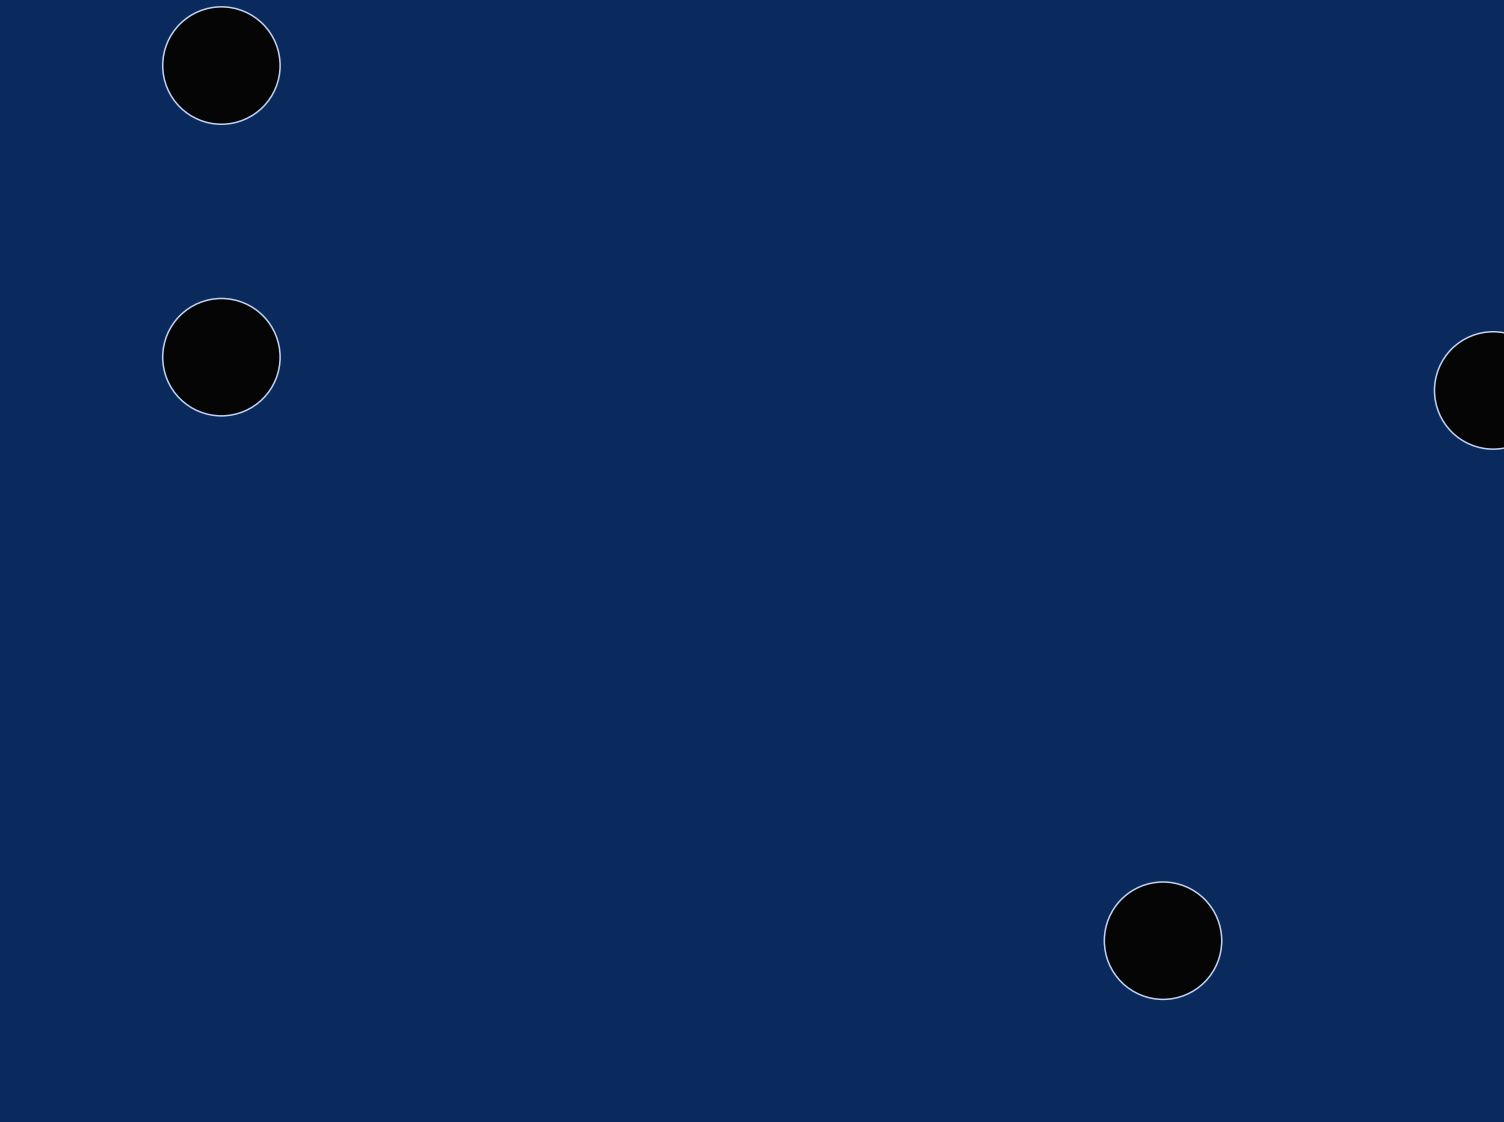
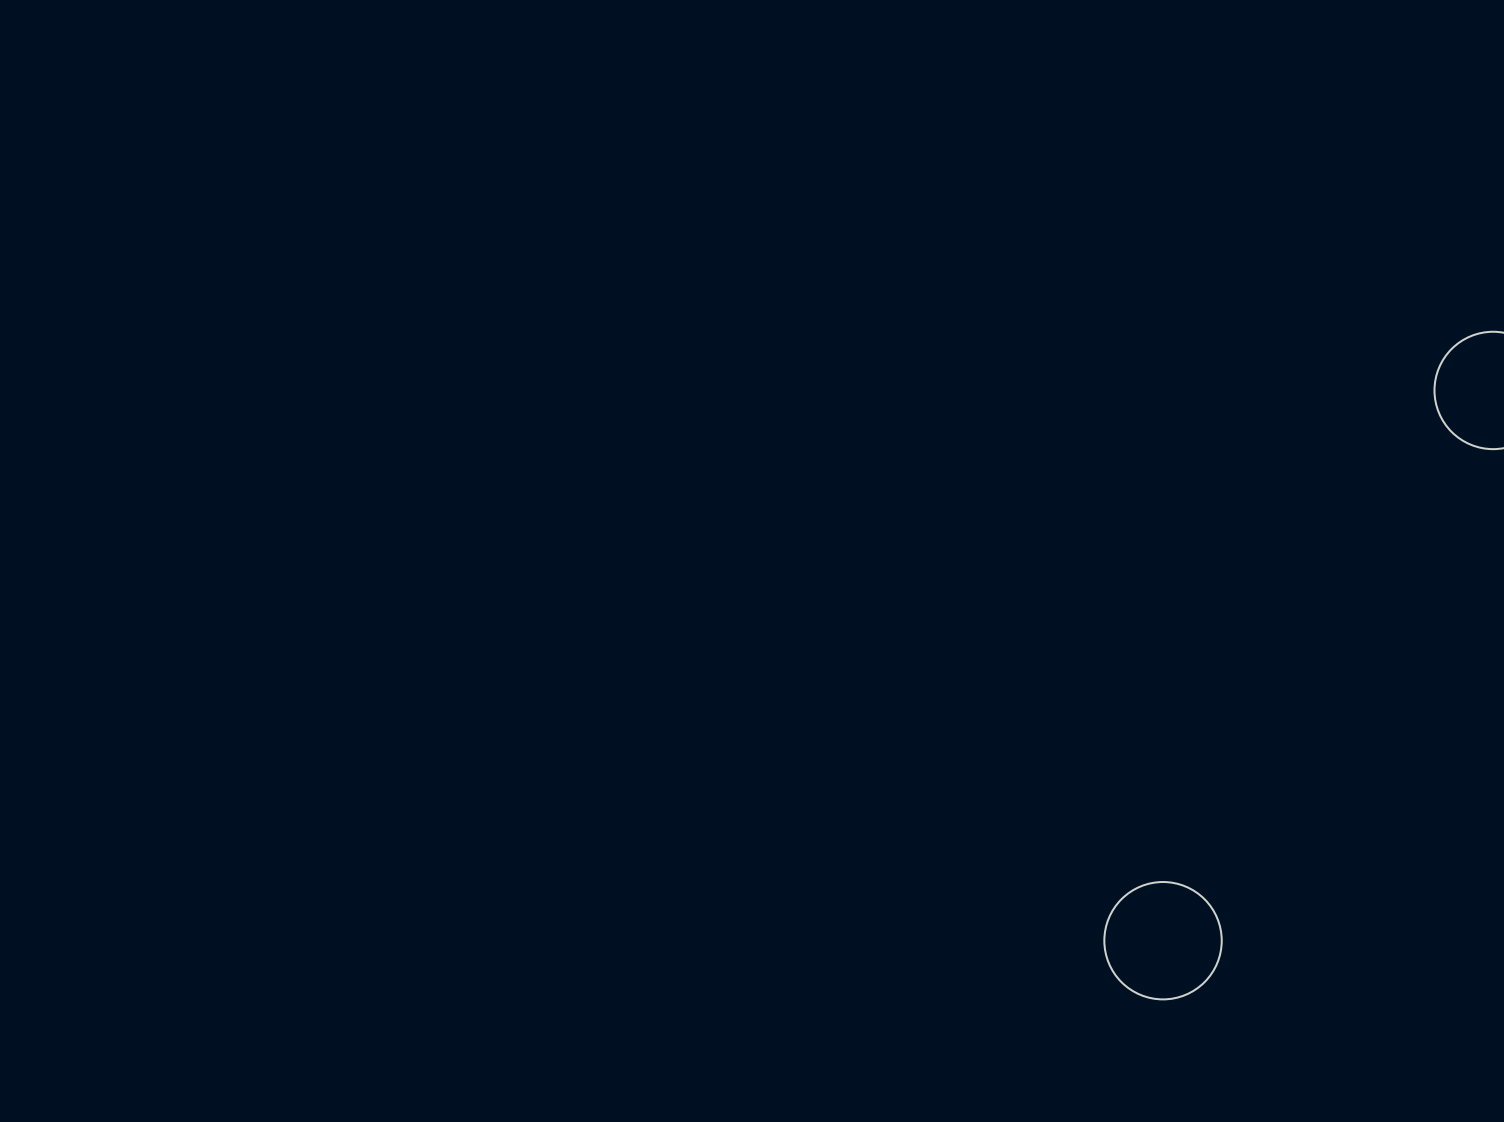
part: (221, 65) -> none
part: (221, 357) -> none

